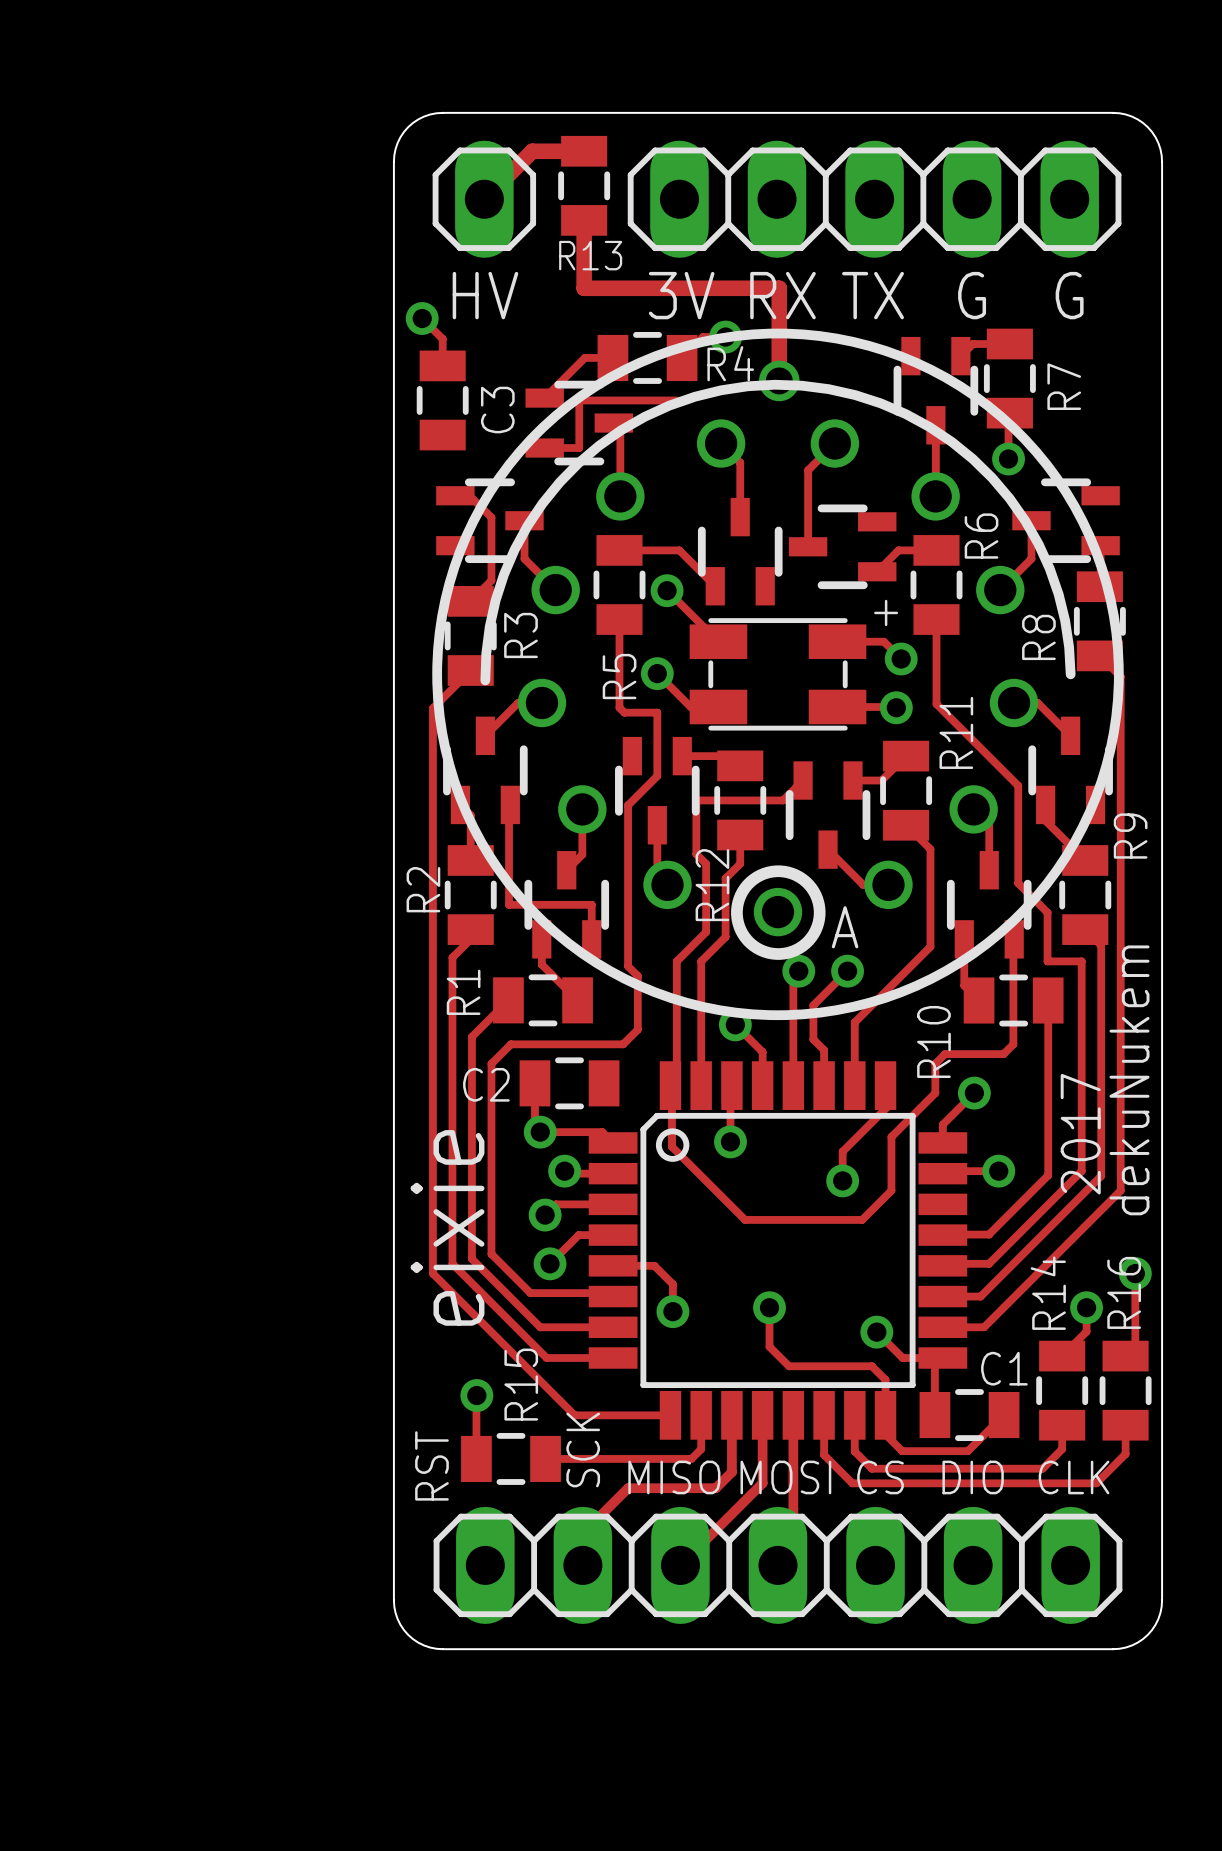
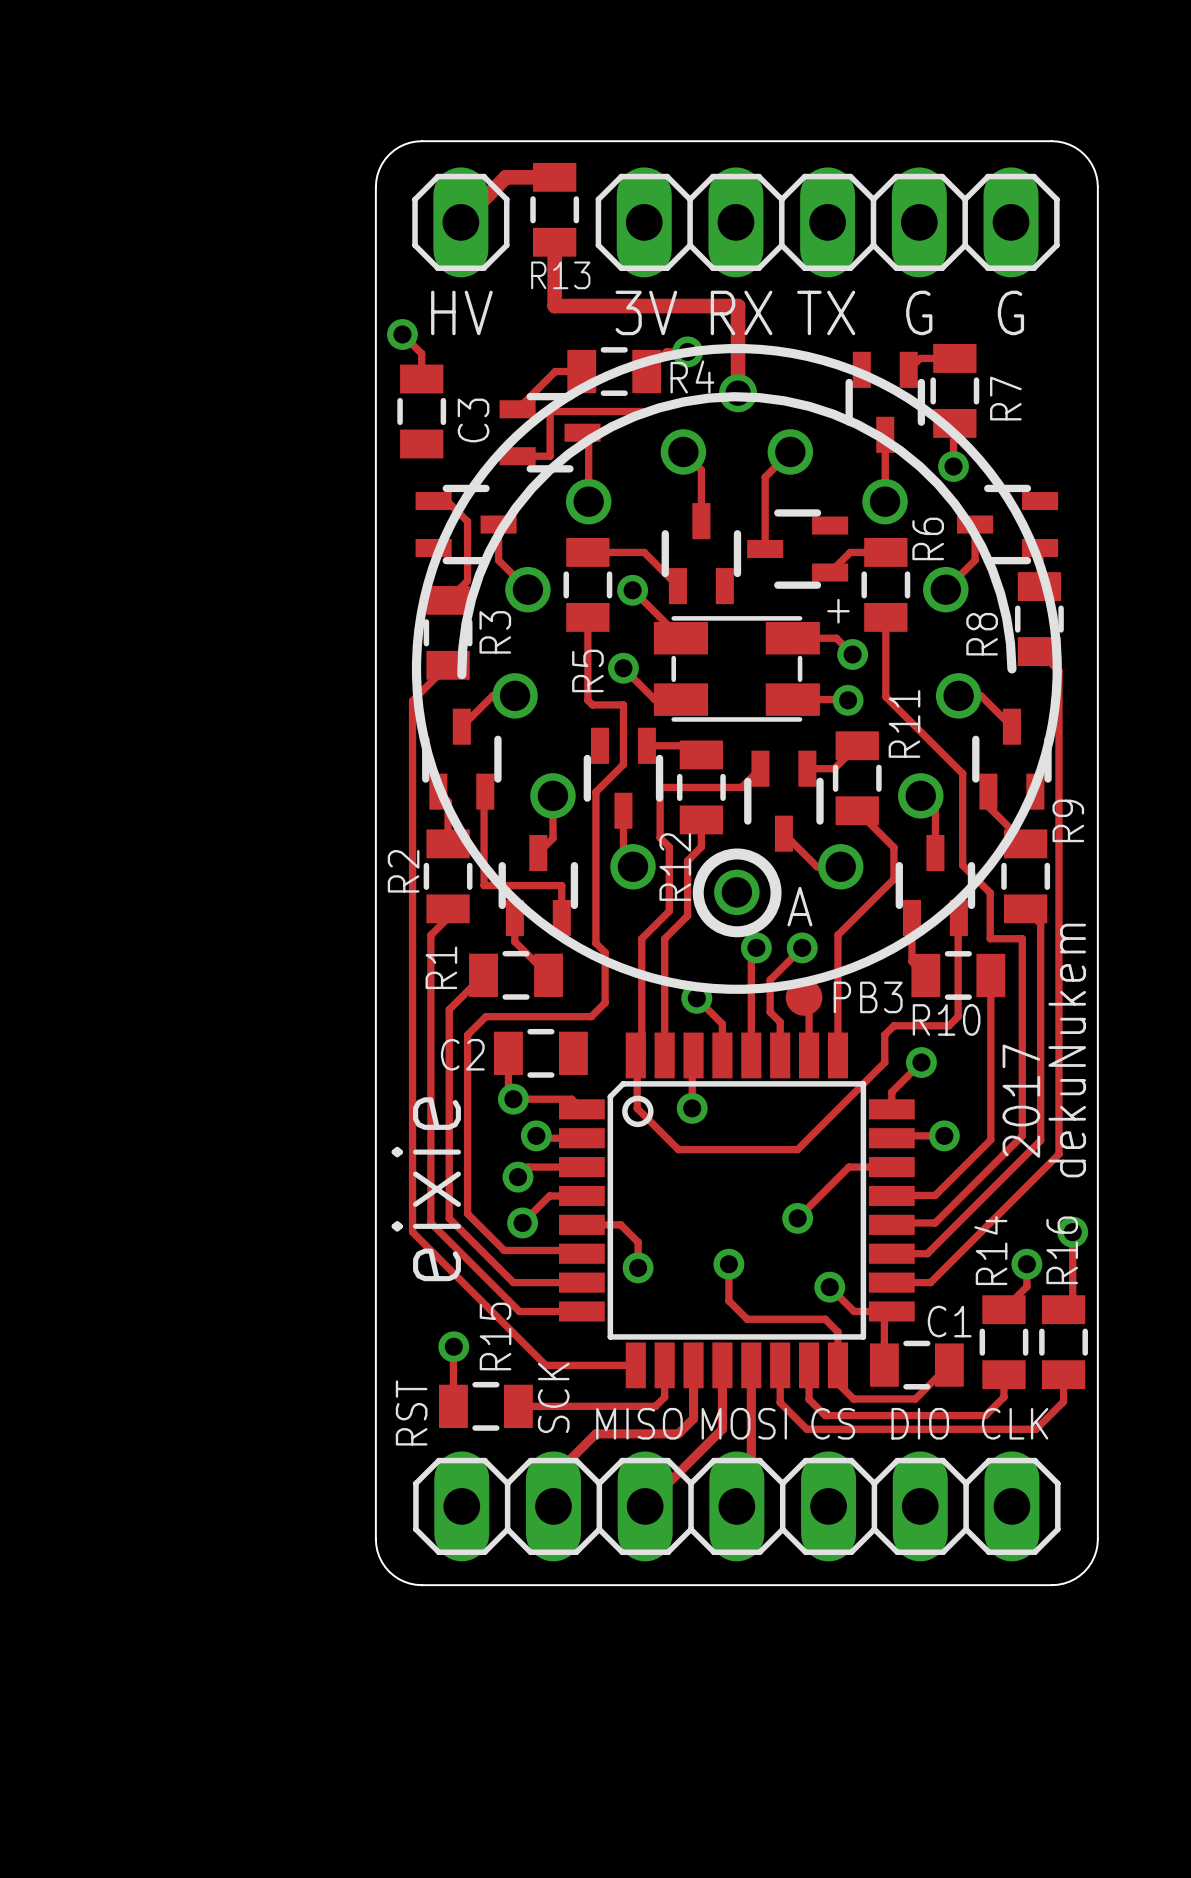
track: (906, 825) (930, 849) (930, 946) (854, 1022) (854, 1029) -> (857, 810) (893, 847) (893, 879) (837, 935) (837, 1055)
part: none -> (804, 997)
text: none -> PB3 (868, 997)
R10 name rotation: 0° (933, 1041) -> 90° clockwise (946, 1019)
track: (885, 1085) (886, 1107) (842, 1151) (842, 1180) -> none
track: (891, 1137) (891, 1190) (862, 1219) (745, 1219) (671, 1146) (671, 1141) -> (843, 1103) (797, 1149) (678, 1149) (637, 1108)
via position: (842, 1180) -> (797, 1218)
track: none -> (891, 1167) (848, 1167) (797, 1218)

